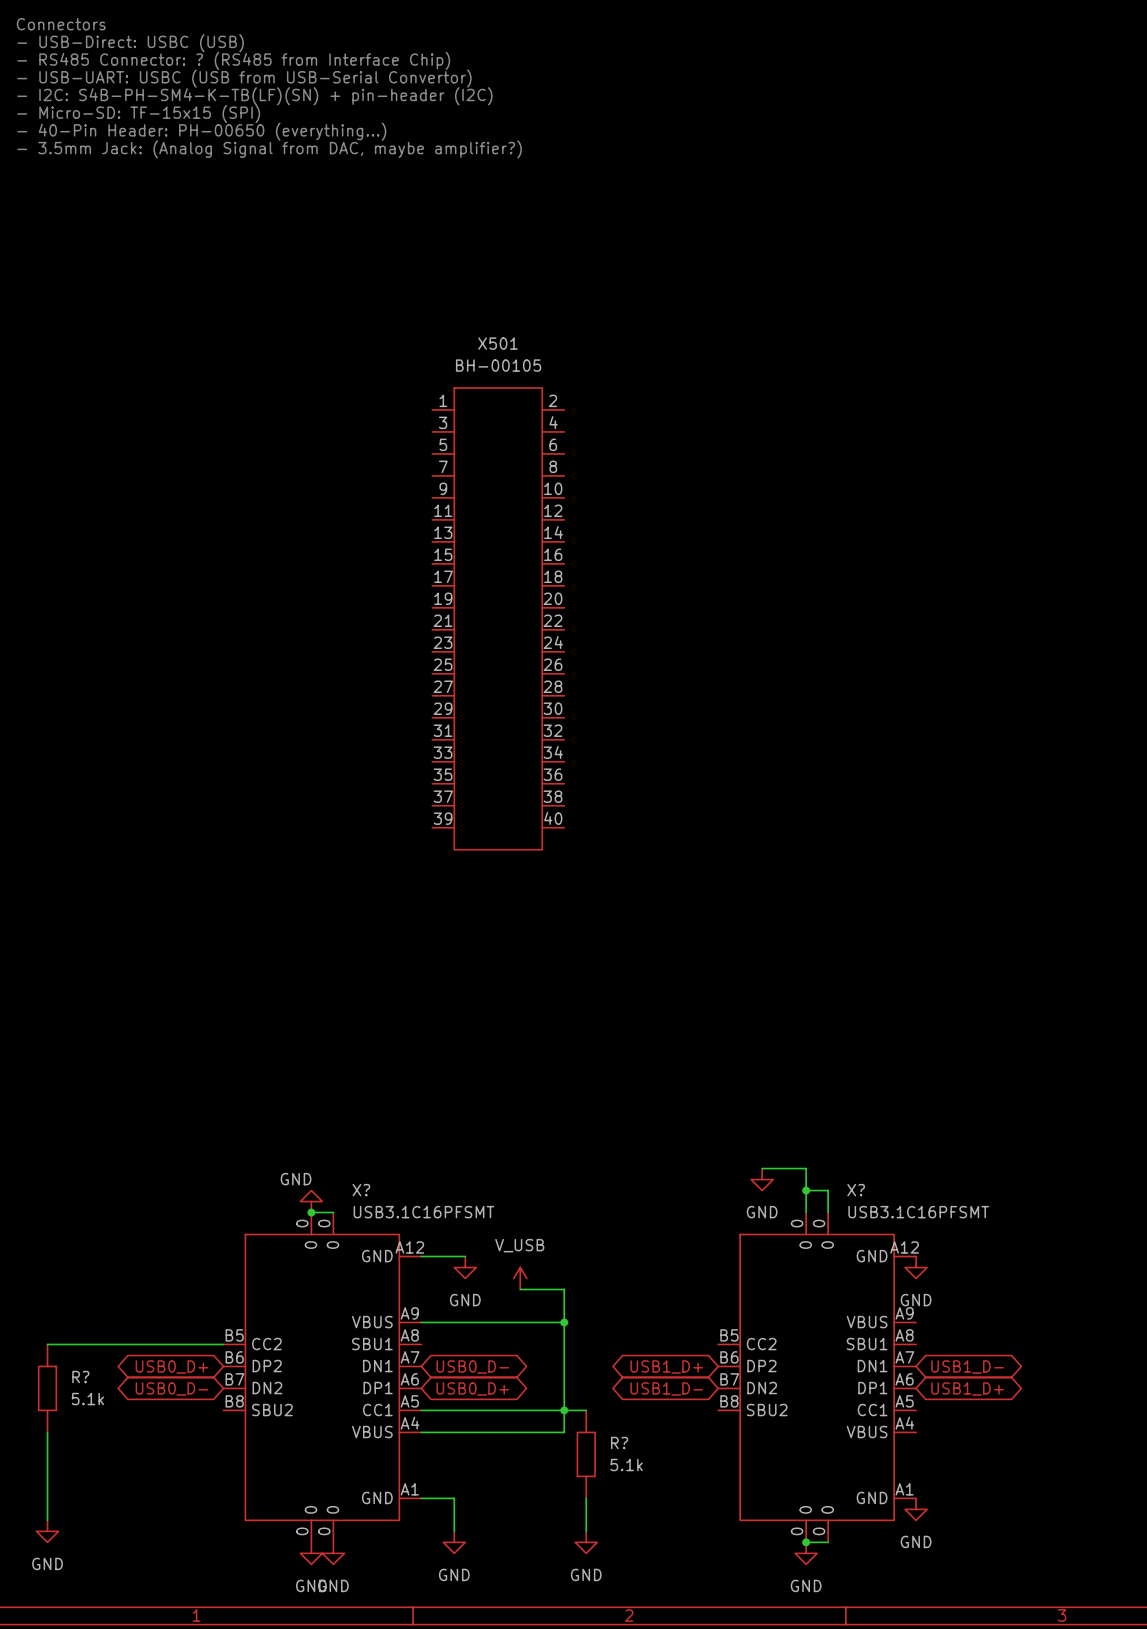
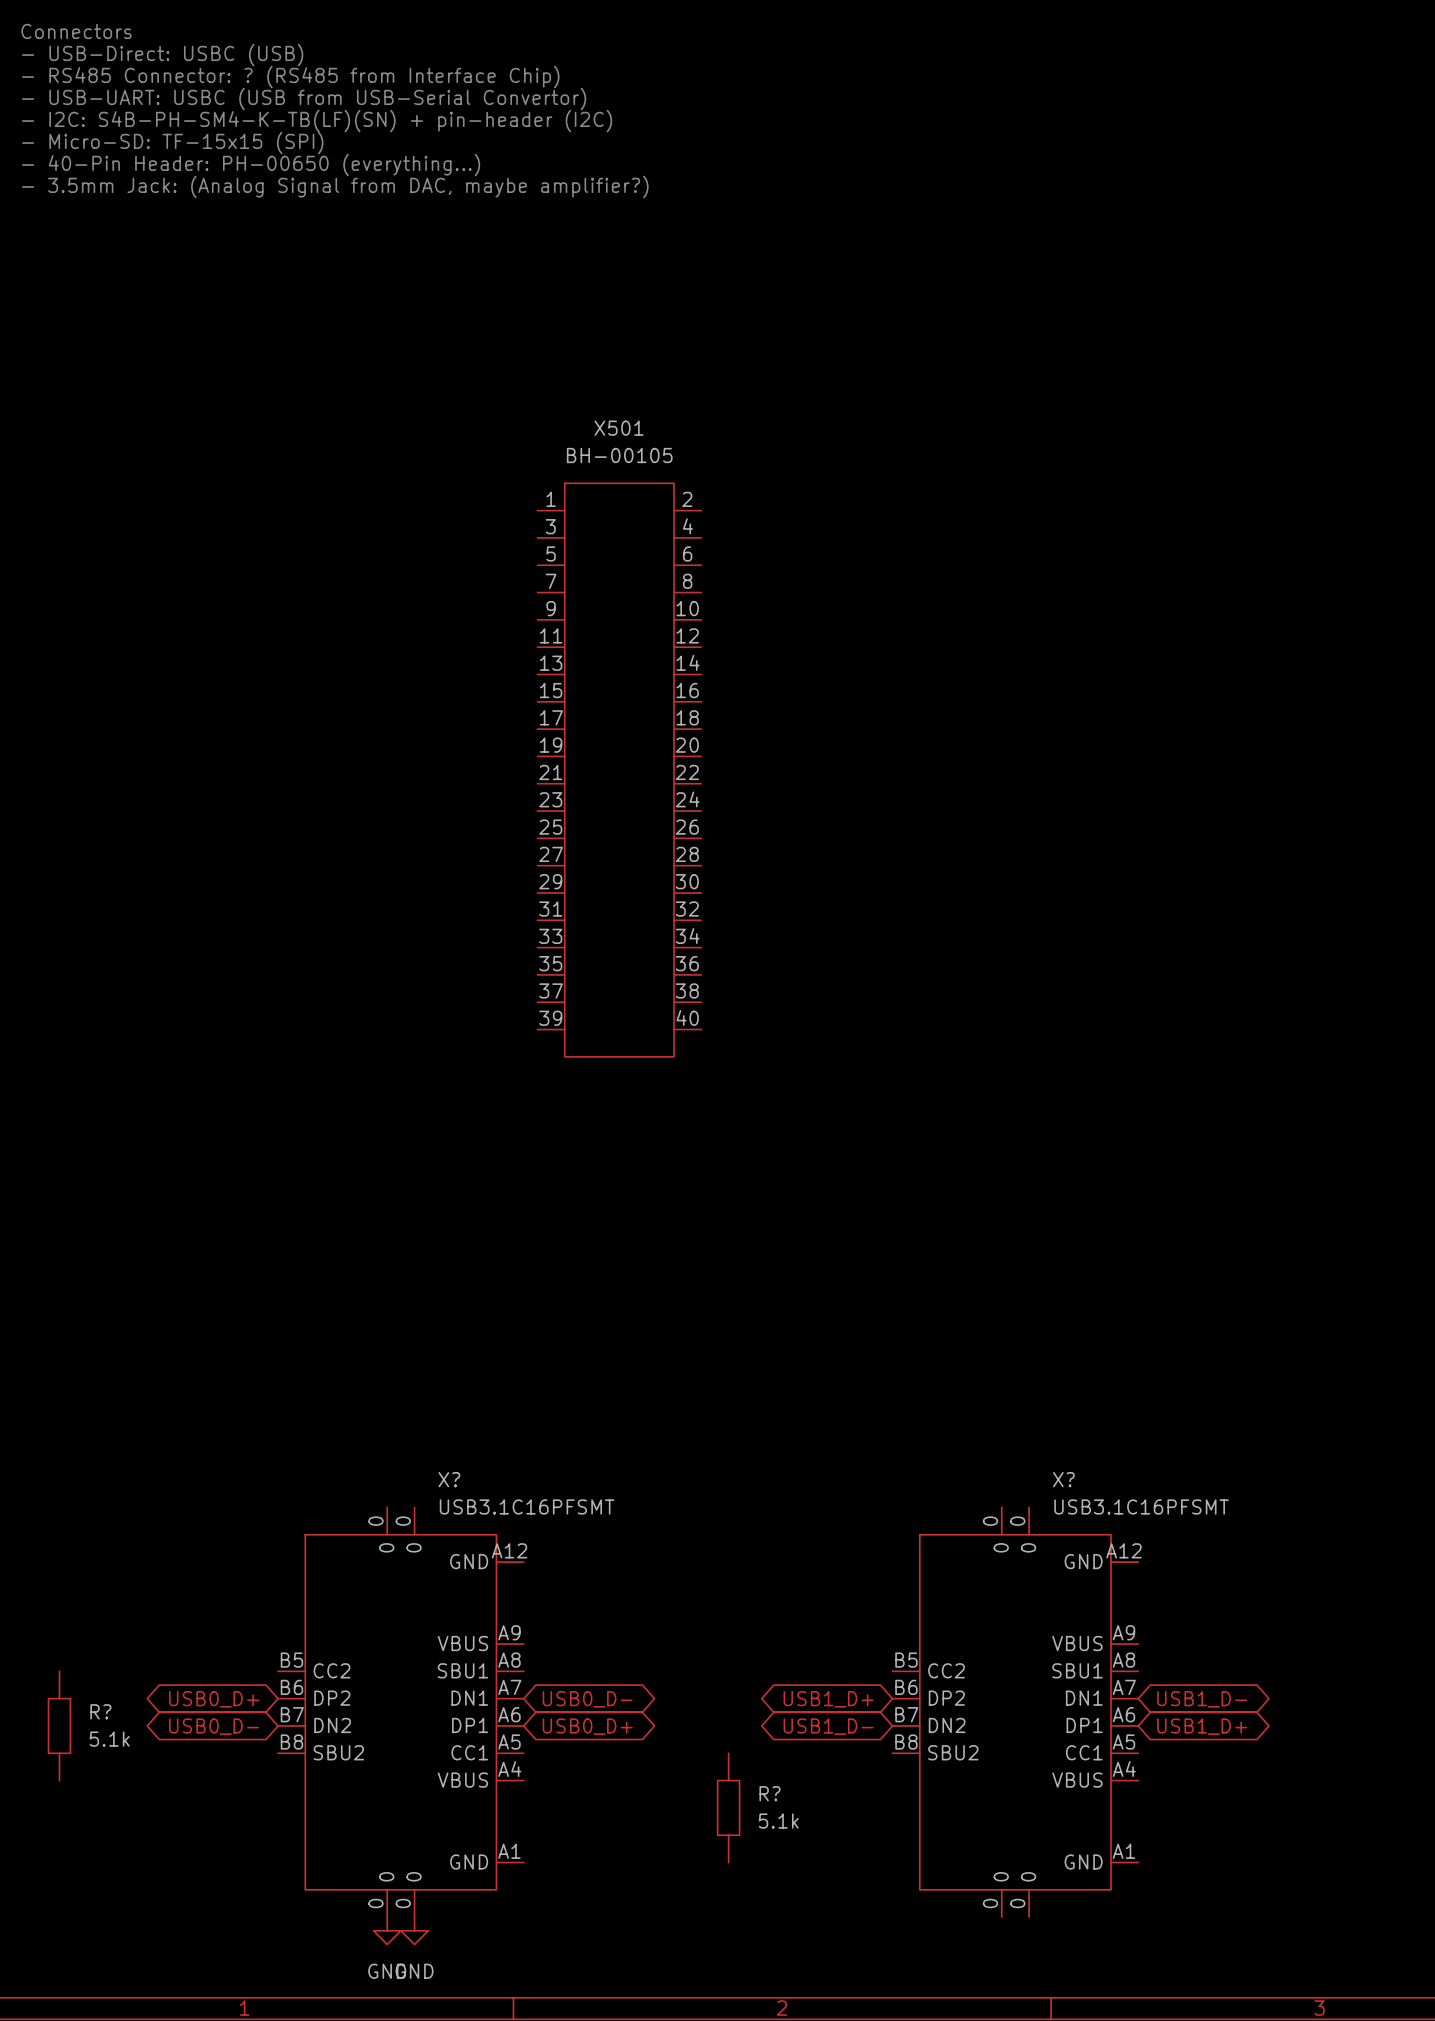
wire: (762, 1168) (806, 1168) (806, 1212) -> none
power symbol: GND (762, 1179) -> none
wire: (806, 1190) (828, 1190) (828, 1212) -> none
junction: (806, 1190) -> none
power symbol: GND (311, 1201) -> none
wire: (311, 1212) (333, 1212) -> none
junction: (311, 1212) -> none
wire: (421, 1256) (465, 1256) -> none
power symbol: GND (465, 1267) -> none
power symbol: GND (916, 1267) -> none
power symbol: V_USB (520, 1278) -> none
wire: (520, 1289) (564, 1289) (564, 1432) (421, 1432) -> none
wire: (421, 1322) (564, 1322) -> none
junction: (564, 1322) -> none
wire: (47, 1344) (223, 1344) -> none
wire: (421, 1410) (586, 1410) -> none
junction: (564, 1410) -> none
wire: (47, 1432) (47, 1520) -> none
wire: (421, 1498) (454, 1498) (454, 1531) -> none
wire: (586, 1498) (586, 1531) -> none
power symbol: GND (916, 1509) -> none
power symbol: GND (47, 1531) -> none
power symbol: GND (454, 1542) -> none
power symbol: GND (586, 1542) -> none
wire: (806, 1542) (828, 1542) -> none
junction: (806, 1542) -> none
power symbol: GND (806, 1553) -> none

